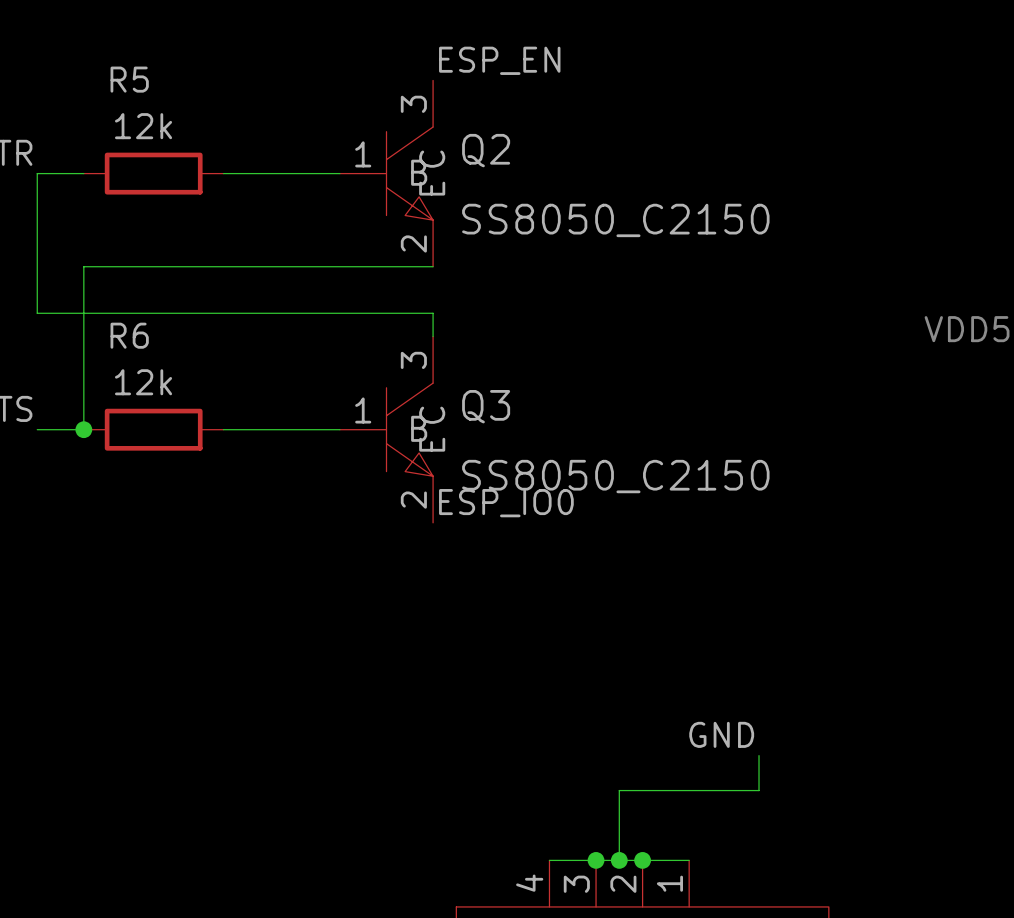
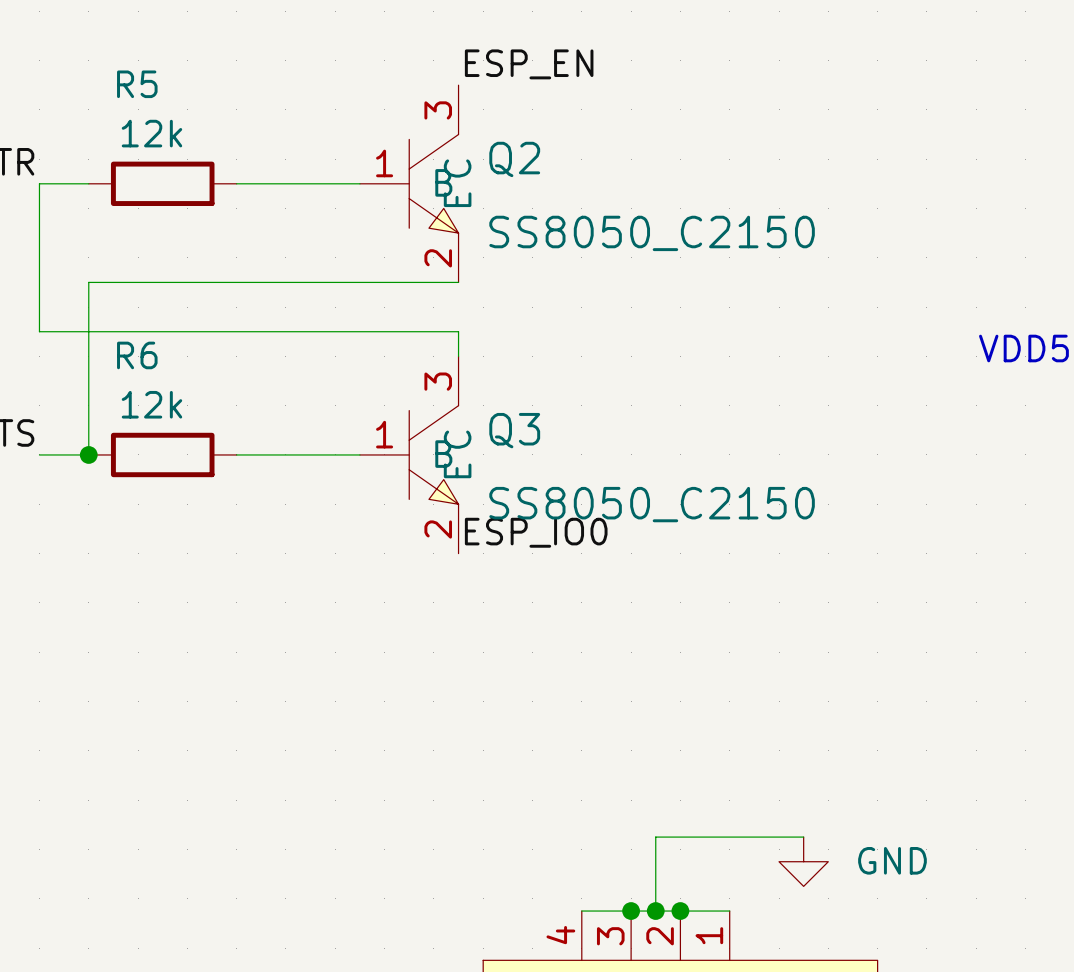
label: GND (721, 734) -> none
wire: (759, 755) (759, 790) -> none
power symbol: none -> GND (803, 861)

